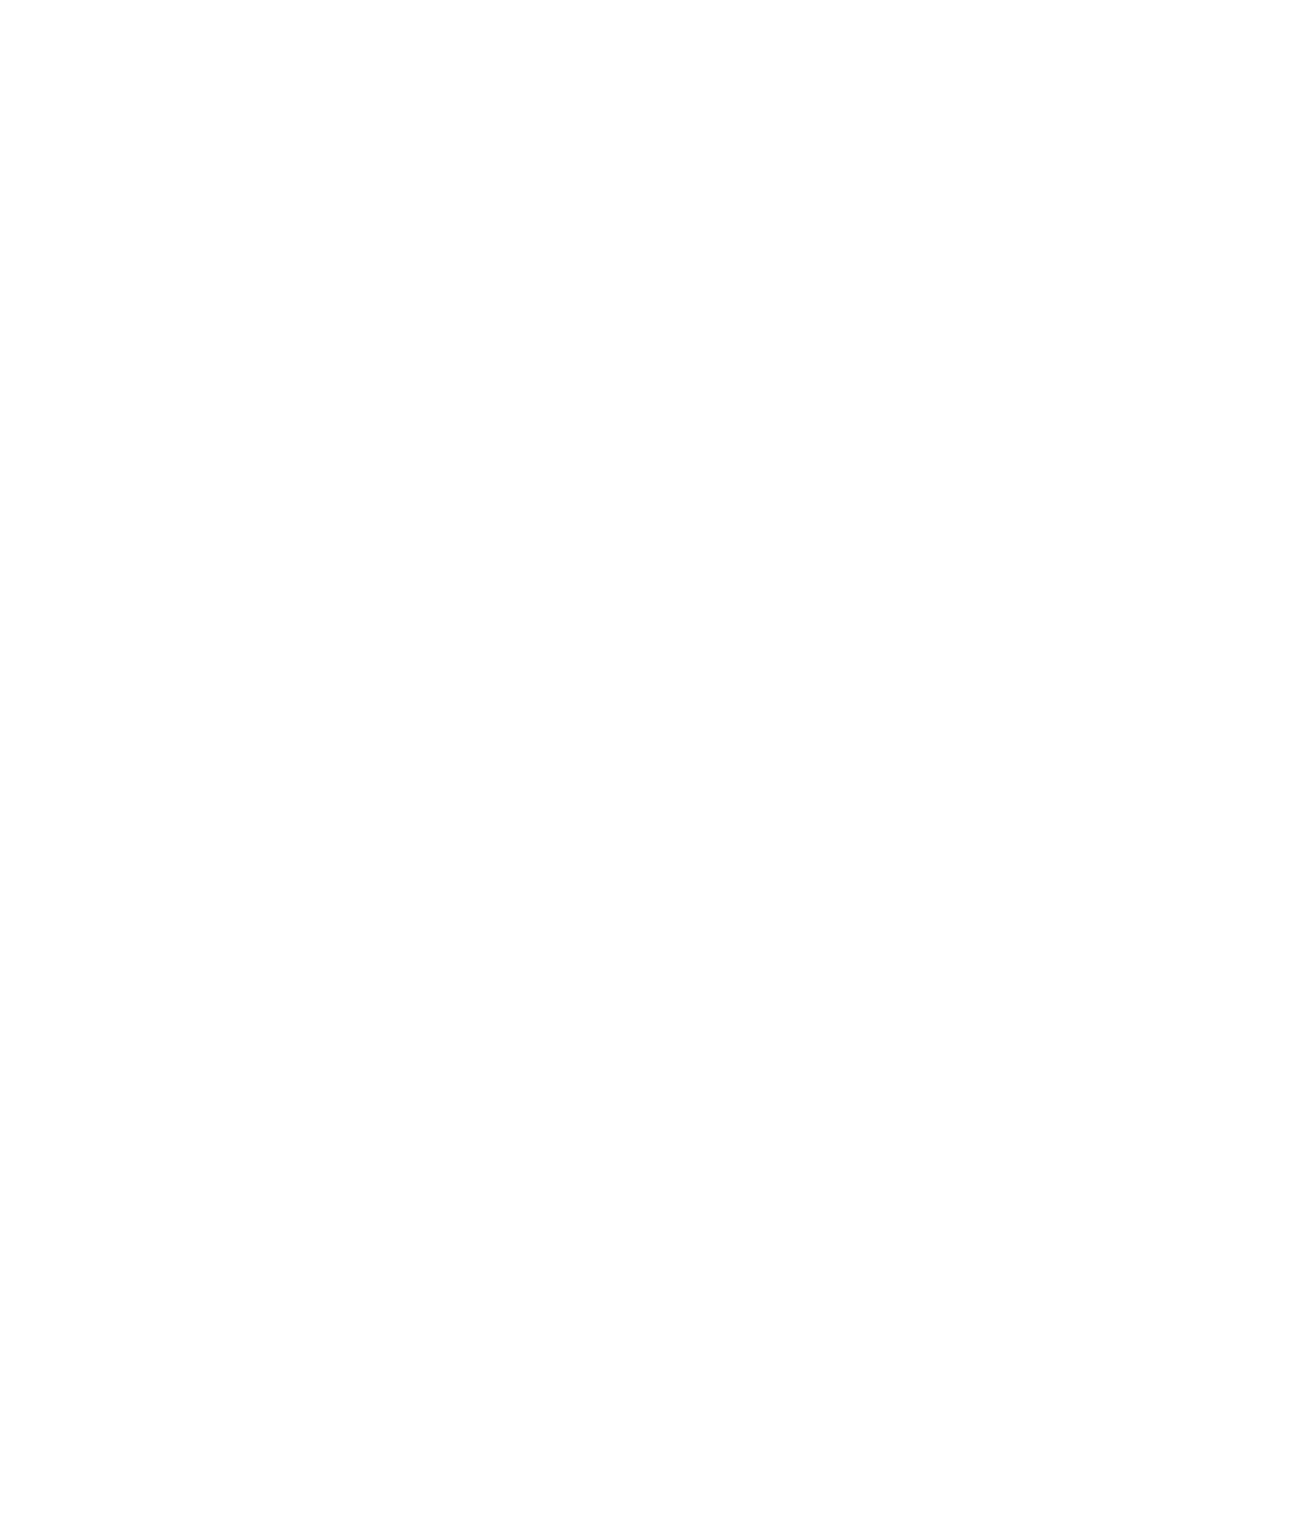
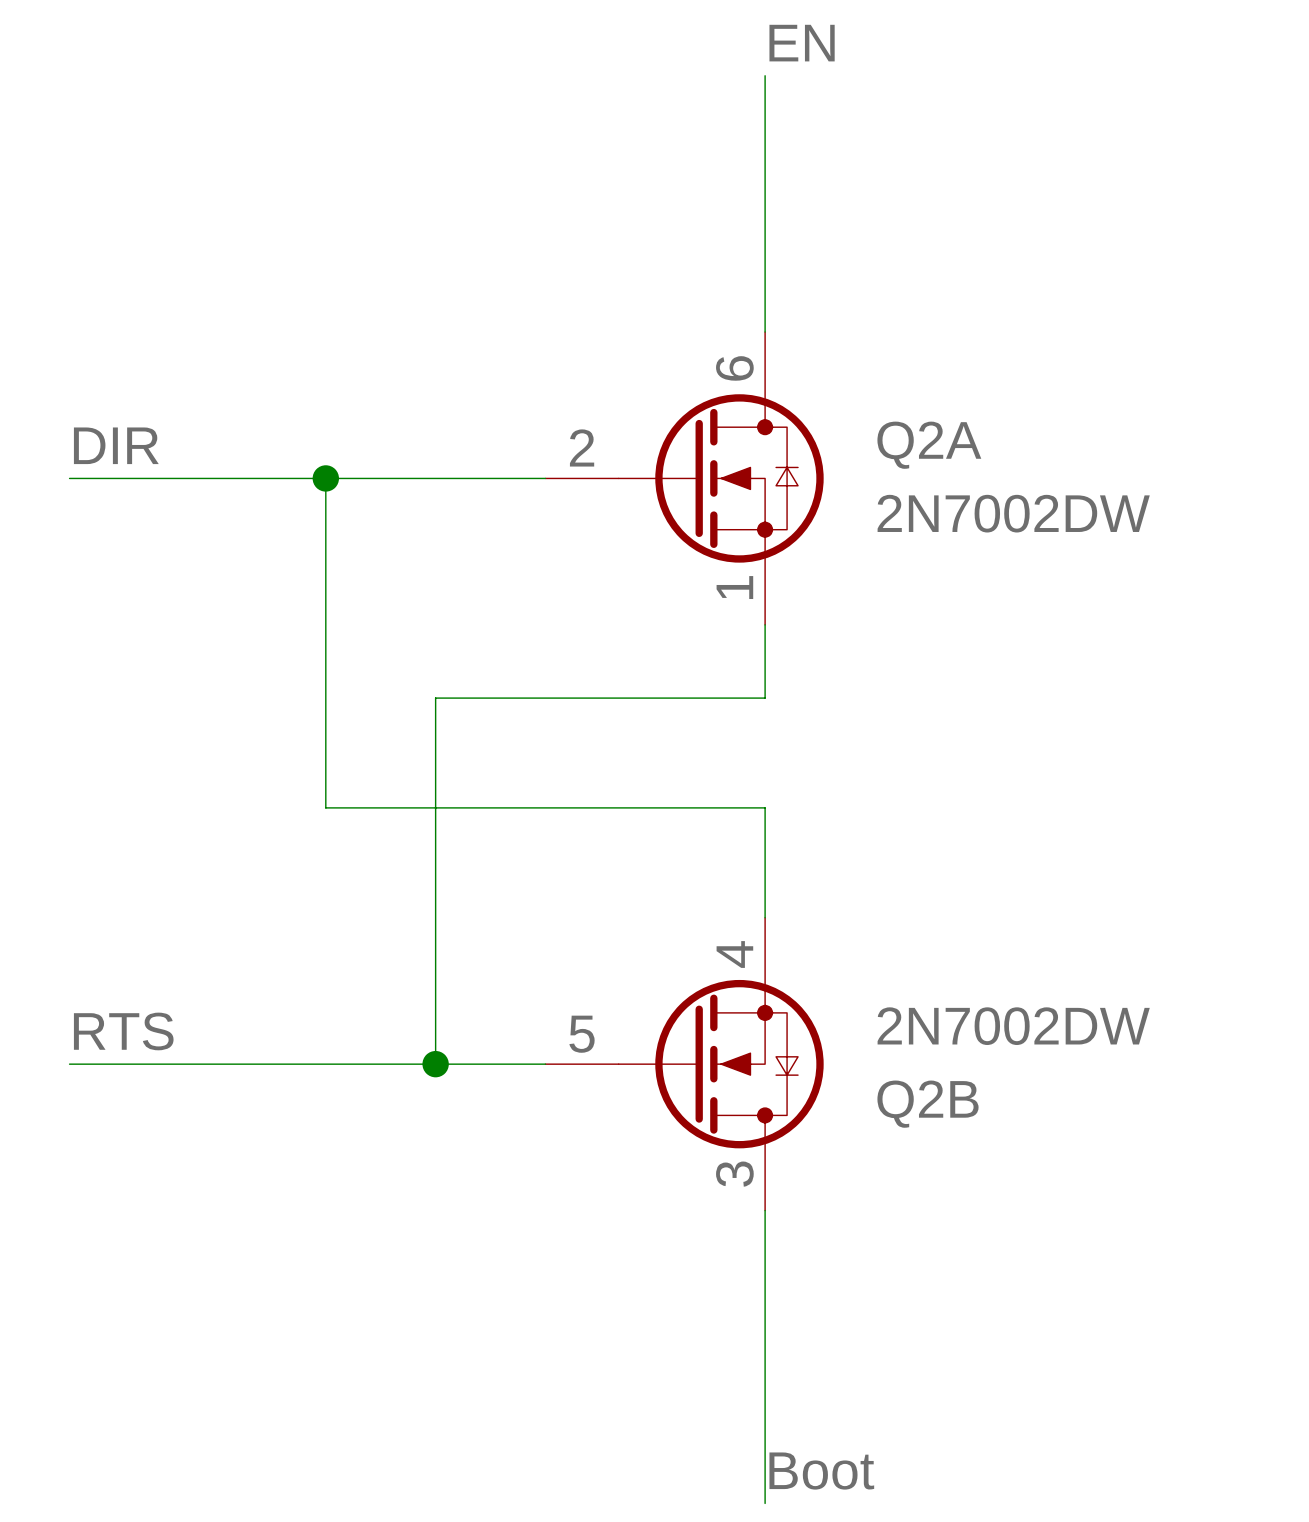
label: none -> EN (802, 43)
wire: none -> (765, 75) (765, 332)
label: none -> DIR (116, 445)
wire: none -> (69, 478) (545, 478)
wire: none -> (325, 478) (325, 807) (765, 807) (765, 917)
junction: none -> (325, 478)
Q2A: none -> 2N7002DW (684, 478)
wire: none -> (765, 624) (765, 698) (435, 698) (435, 1064)
label: none -> RTS (123, 1031)
wire: none -> (69, 1064) (545, 1064)
junction: none -> (435, 1064)
Q2B: none -> 2N7002DW (684, 1064)
wire: none -> (765, 1210) (765, 1503)
label: none -> Boot (821, 1471)

